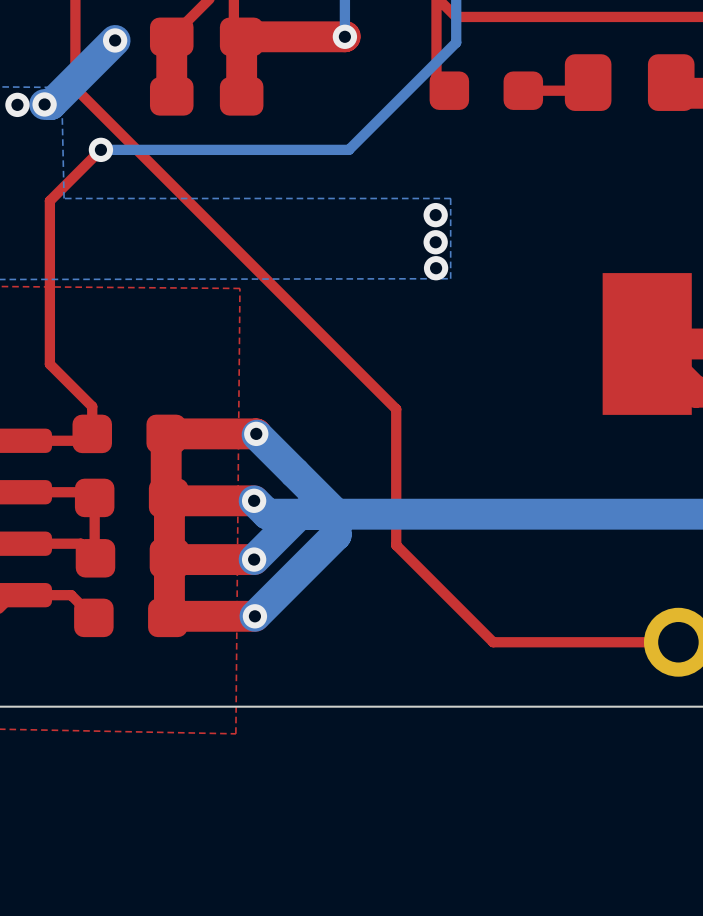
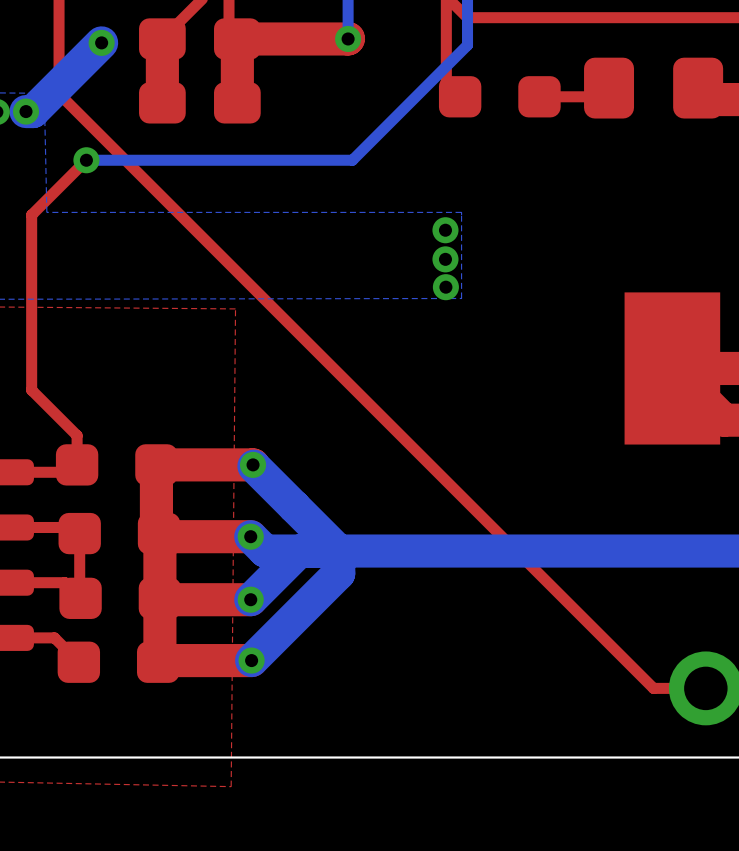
top track: (75, 88) (396, 409) (396, 545) (493, 642) (629, 642) -> (59, 93) (653, 688)

